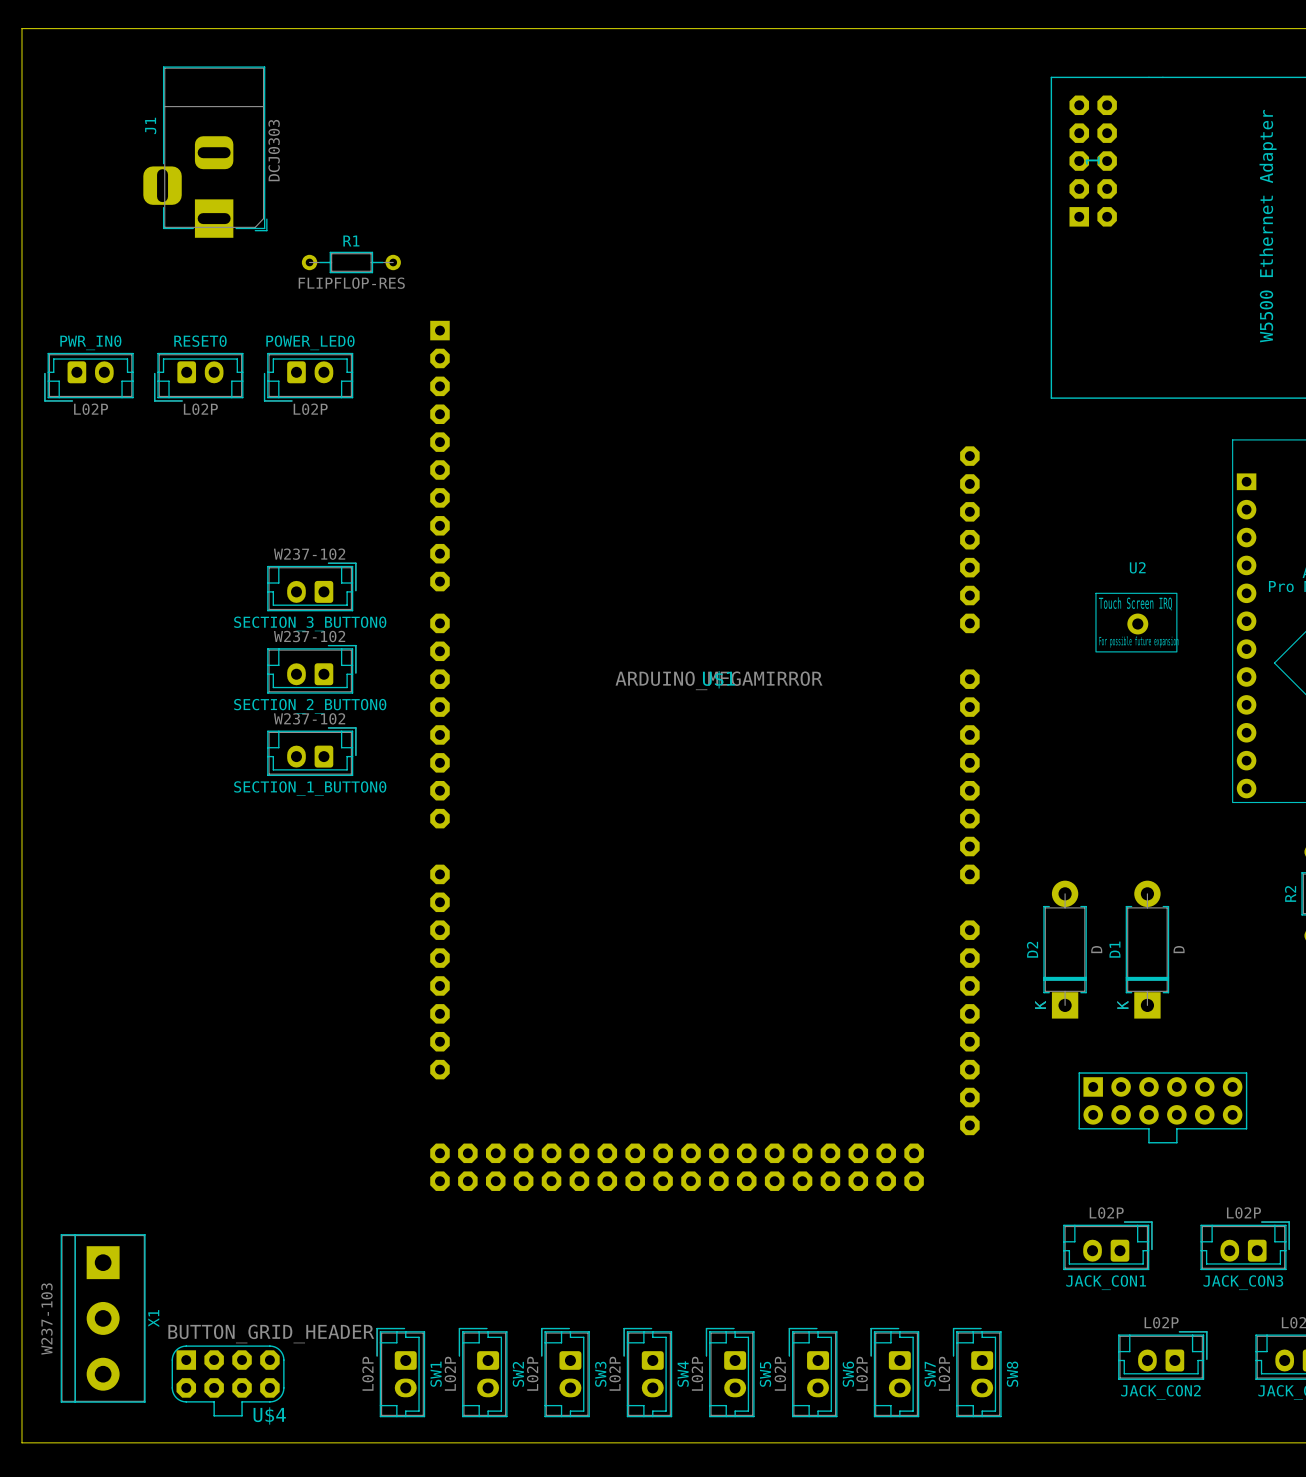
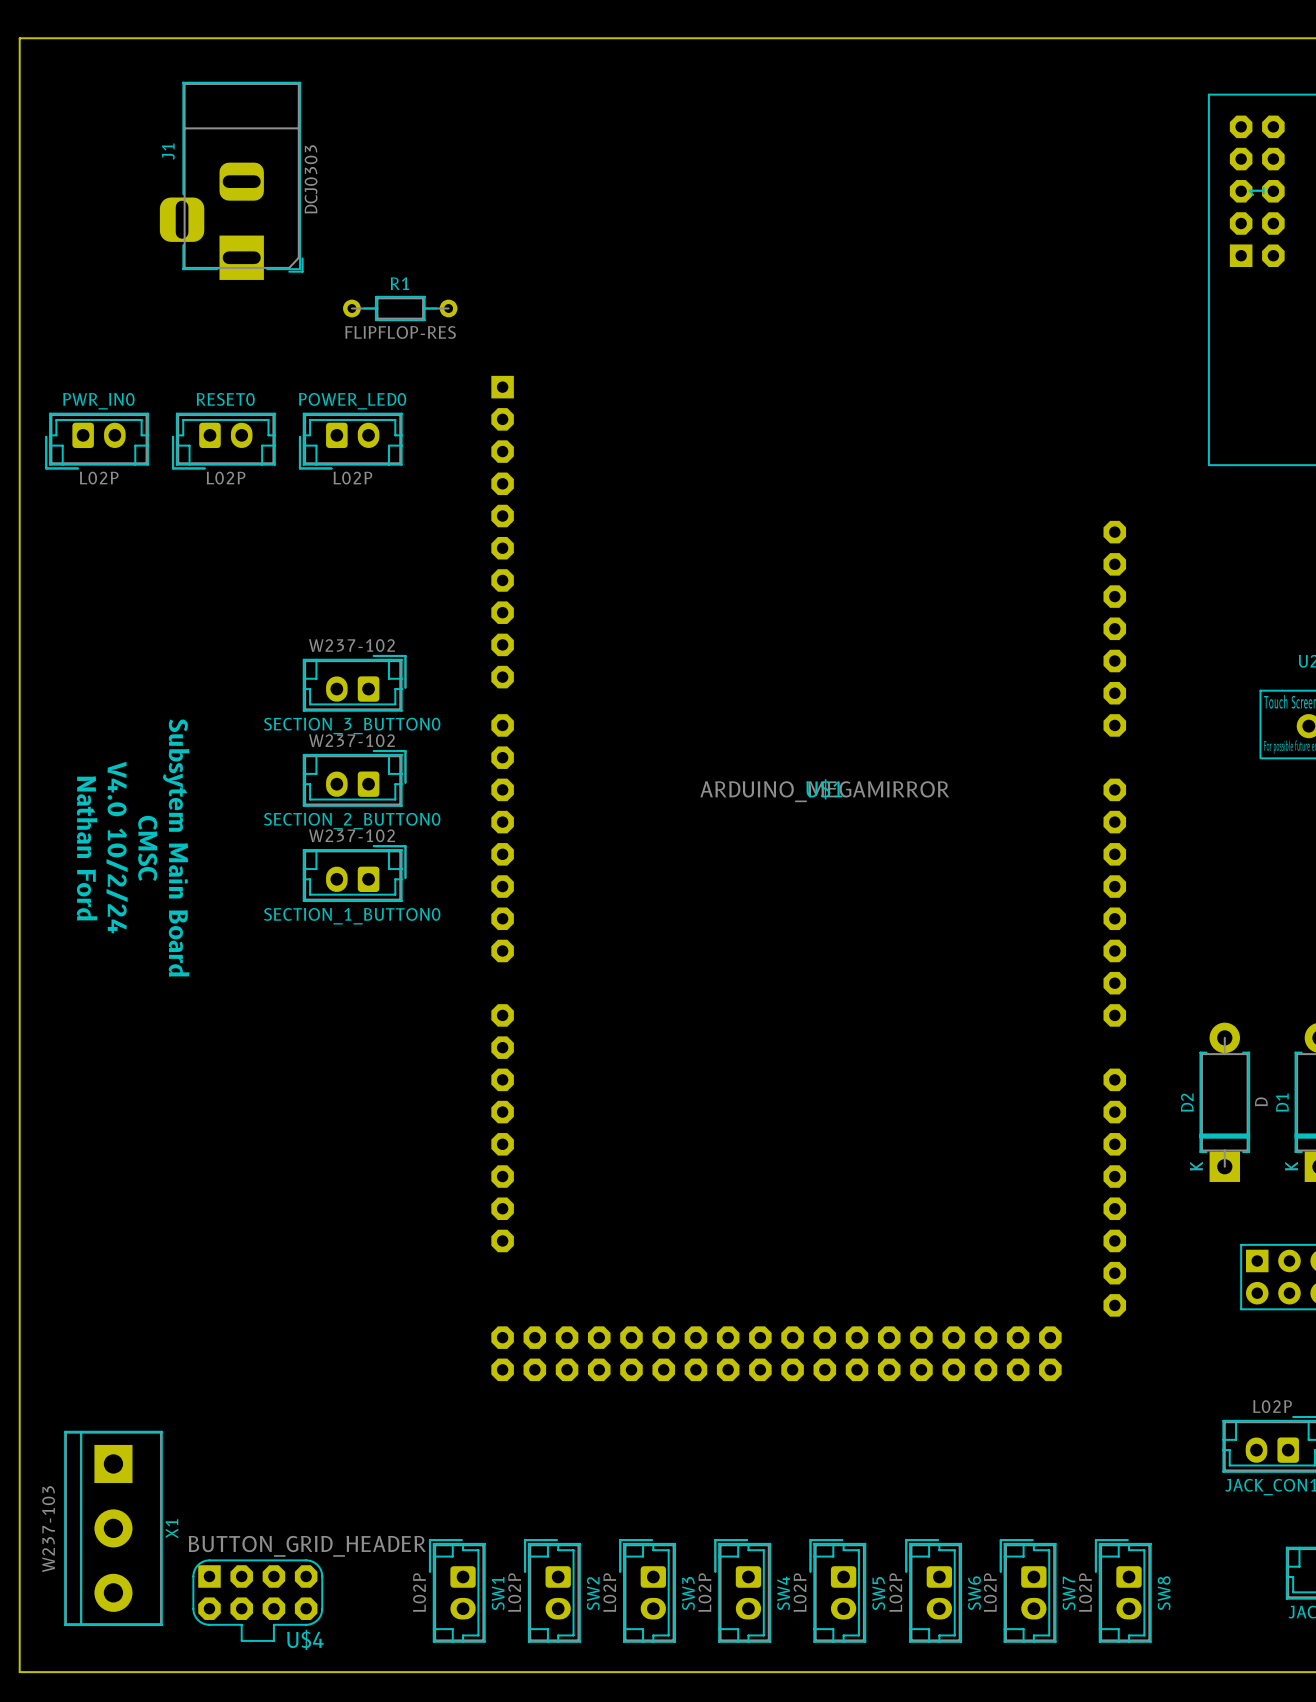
text: none -> Nathan Ford (87, 848)
text: none -> V4.0 10/2/24 (117, 847)
text: none -> CMSC (147, 848)
text: none -> Subsytem Main Board (176, 848)

